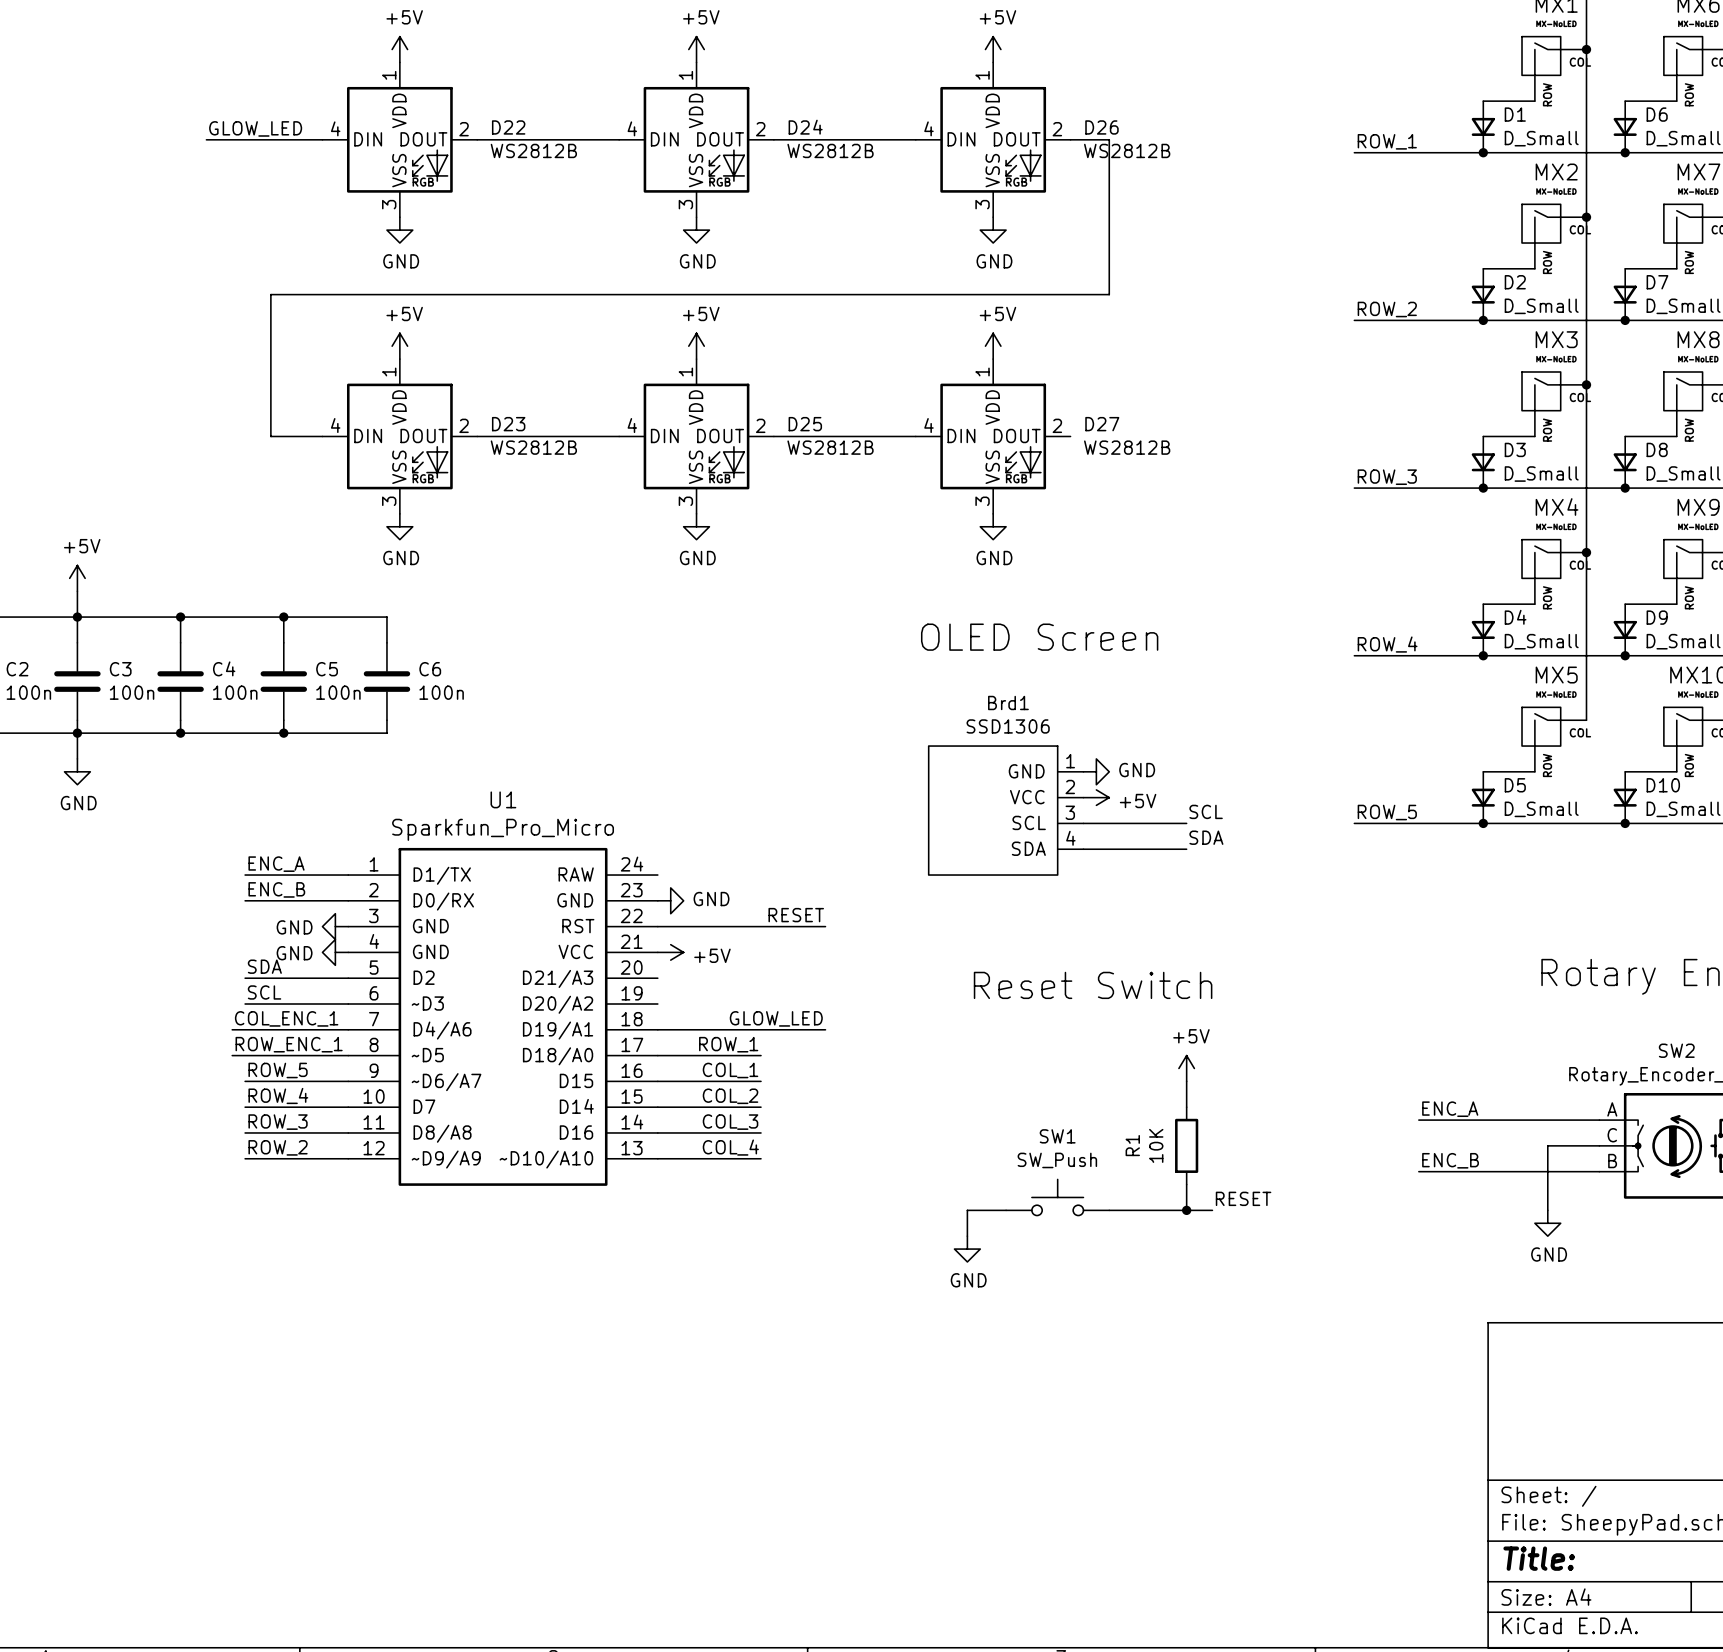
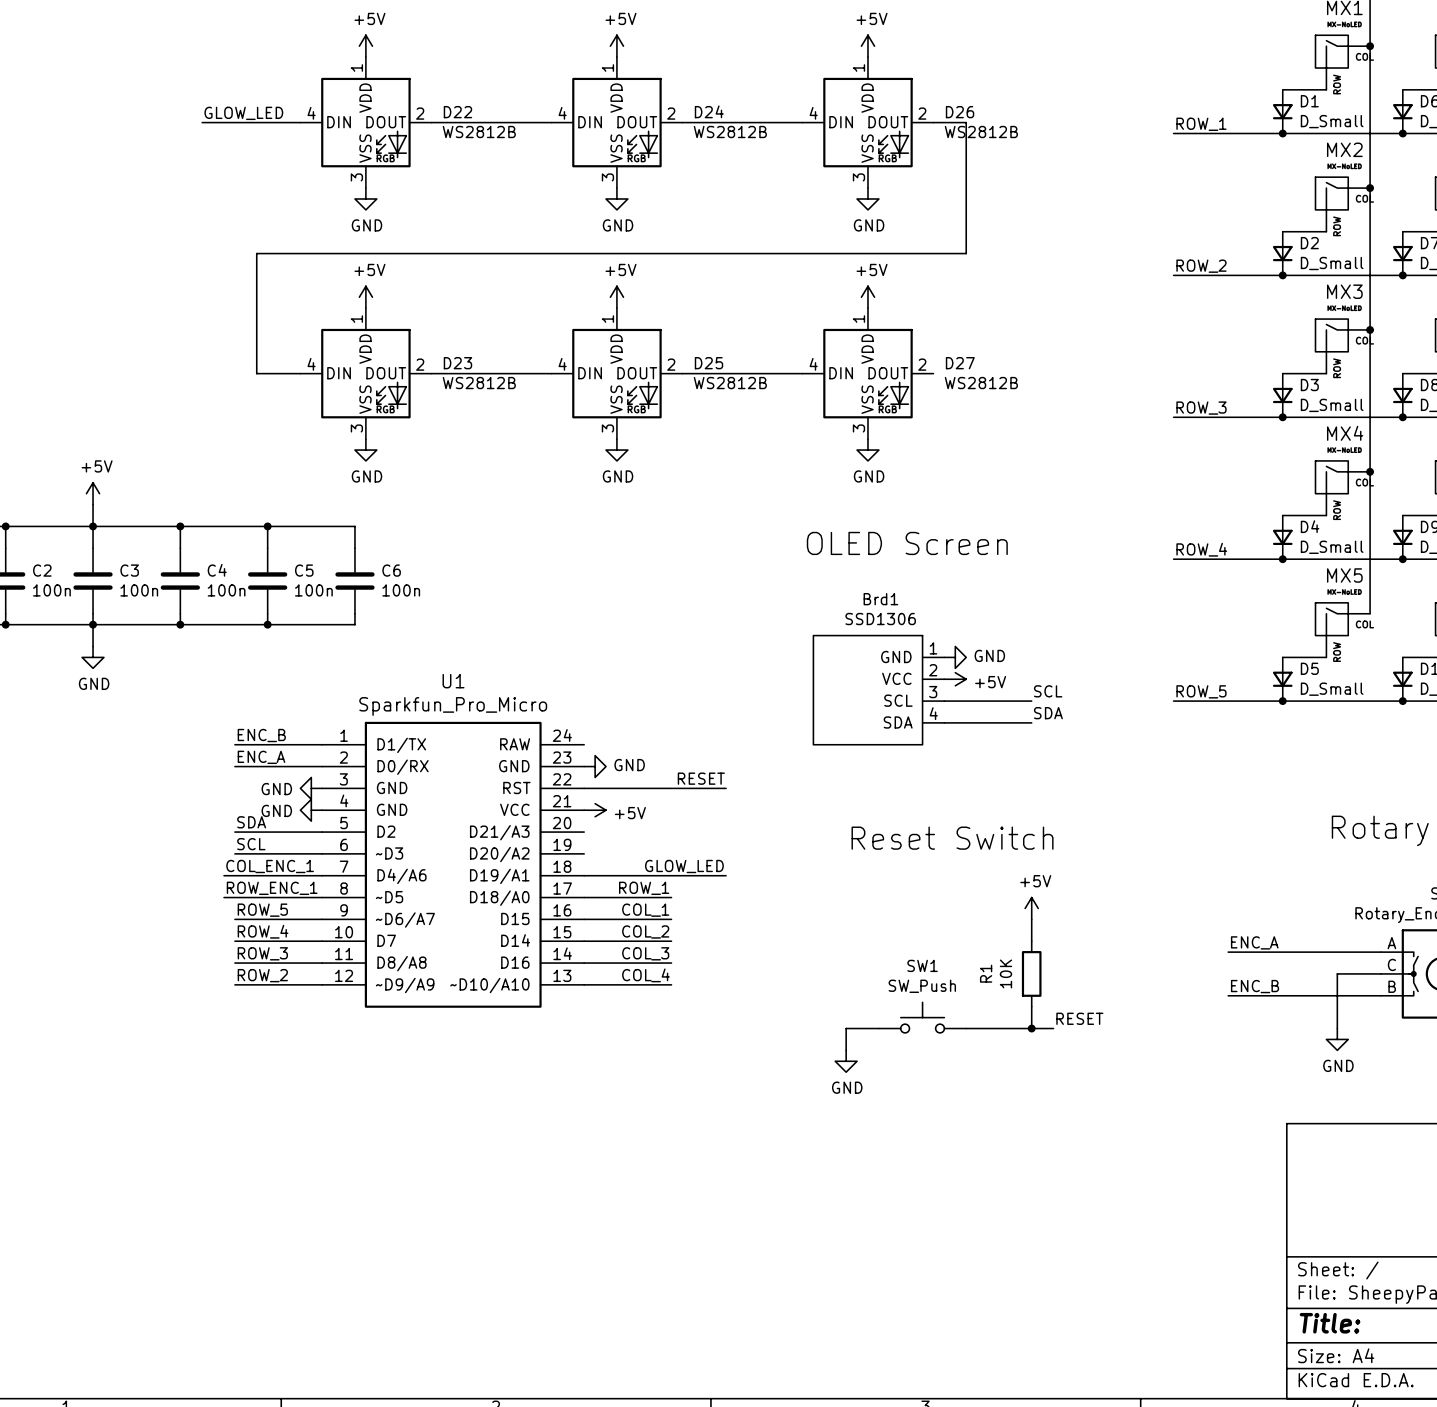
label: ENC_A (276, 864) -> ENC_B (261, 735)
label: ENC_B (276, 889) -> ENC_A (261, 757)

